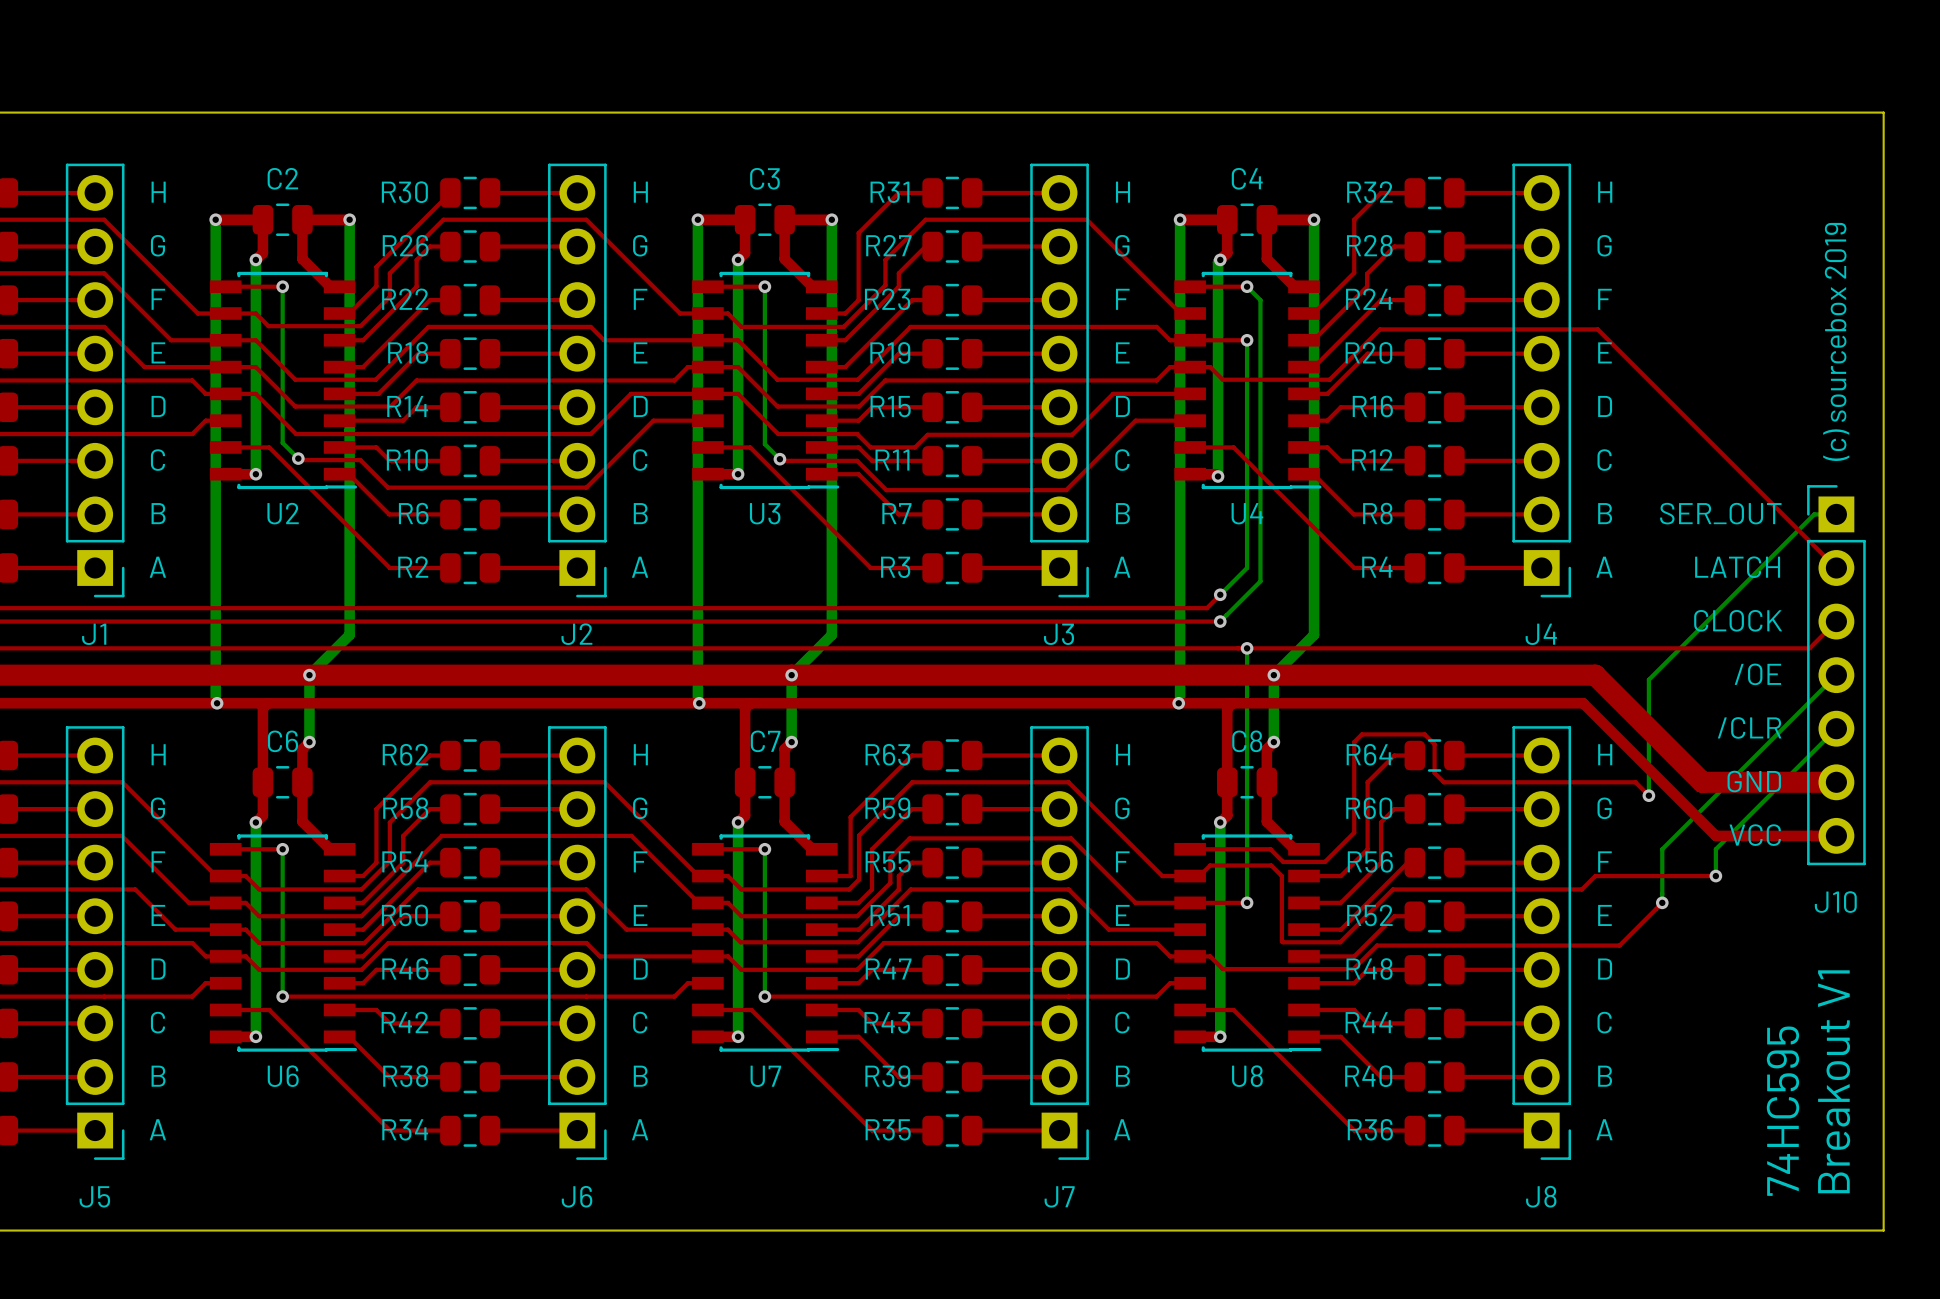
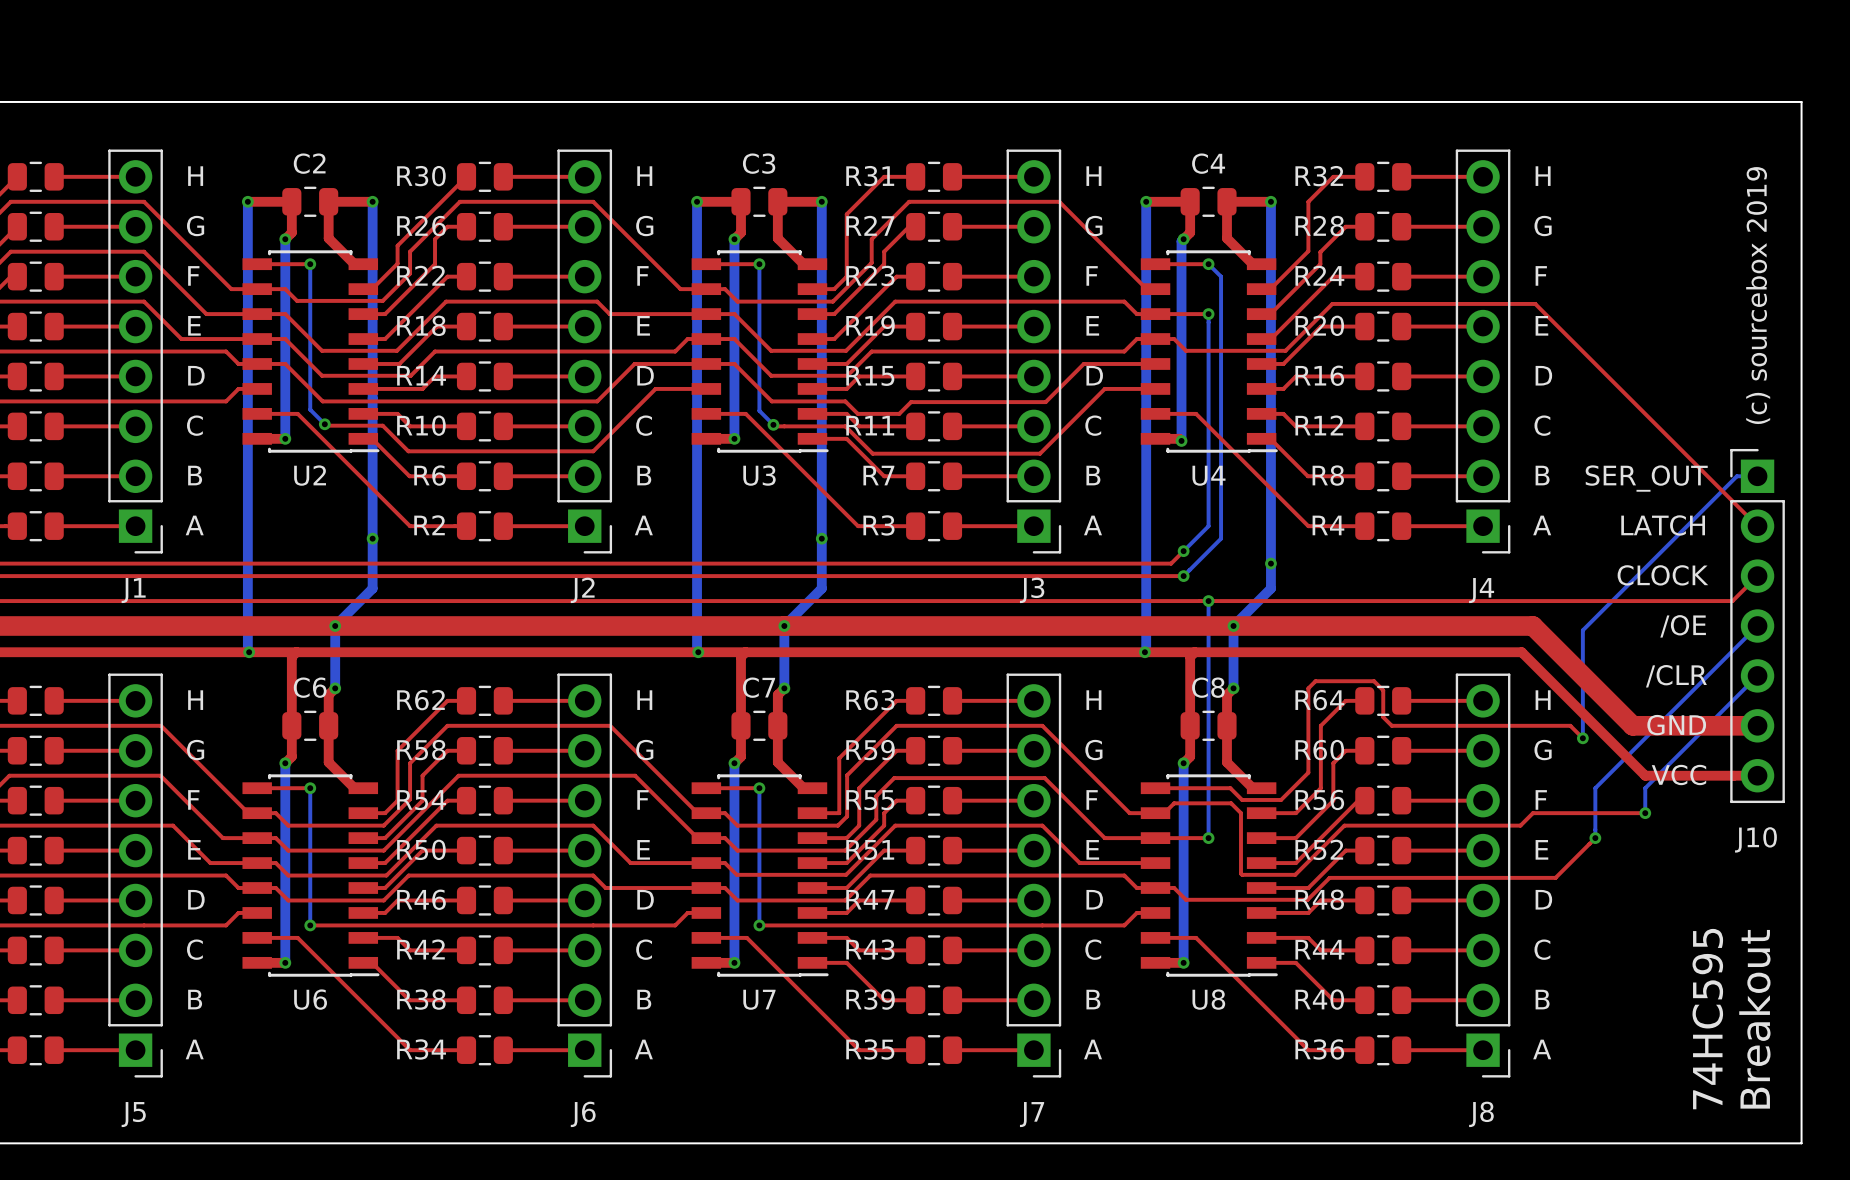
via: none -> (372, 538)
via: none -> (821, 538)
via: none -> (1270, 563)
text: Breakout V1 (1834, 1081) -> Breakout (1754, 1019)

